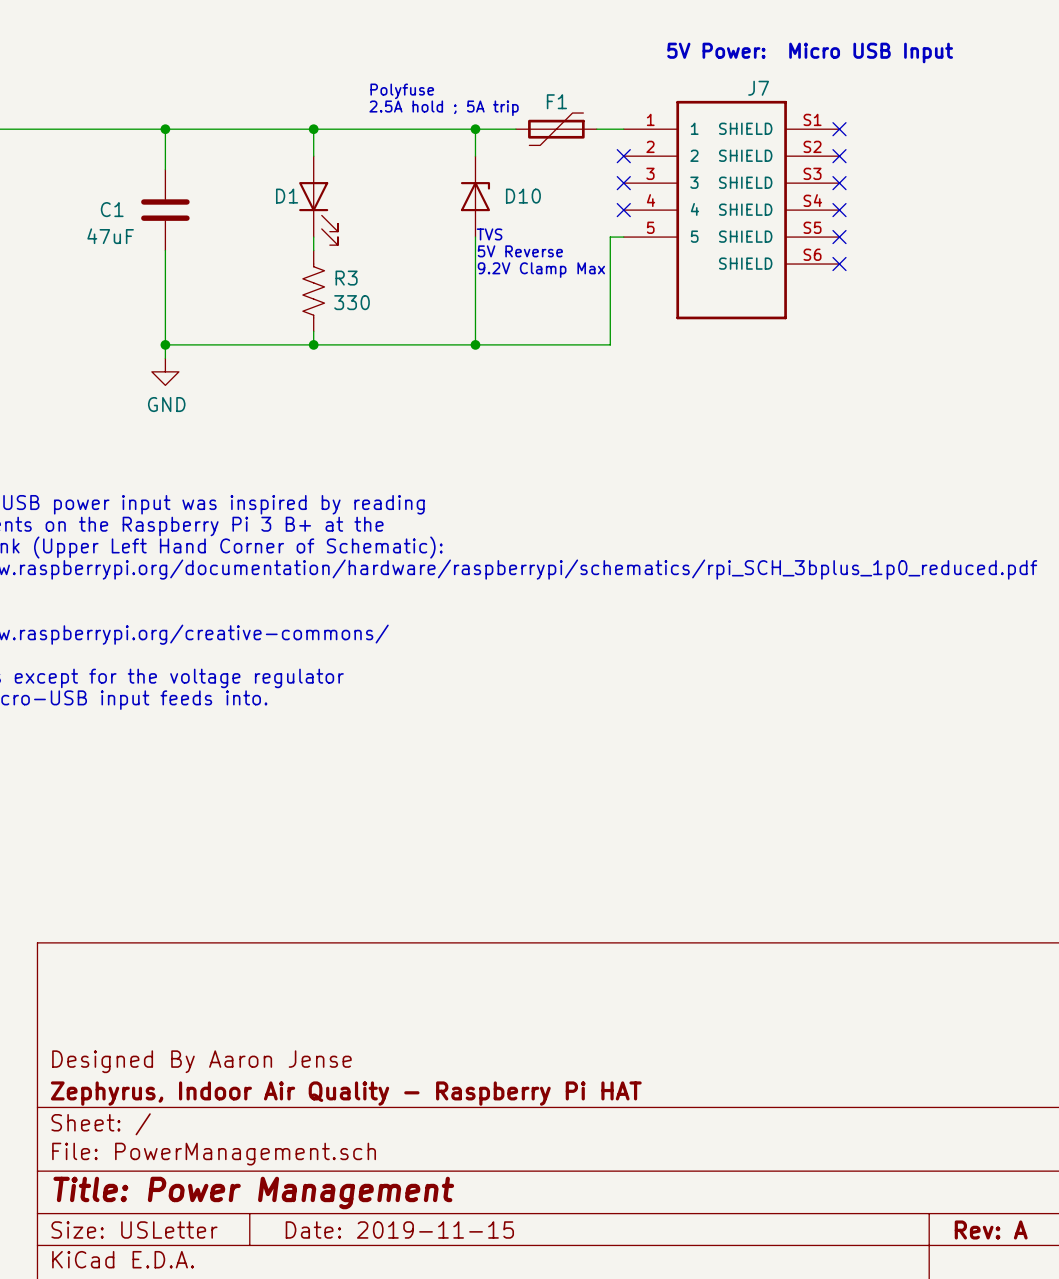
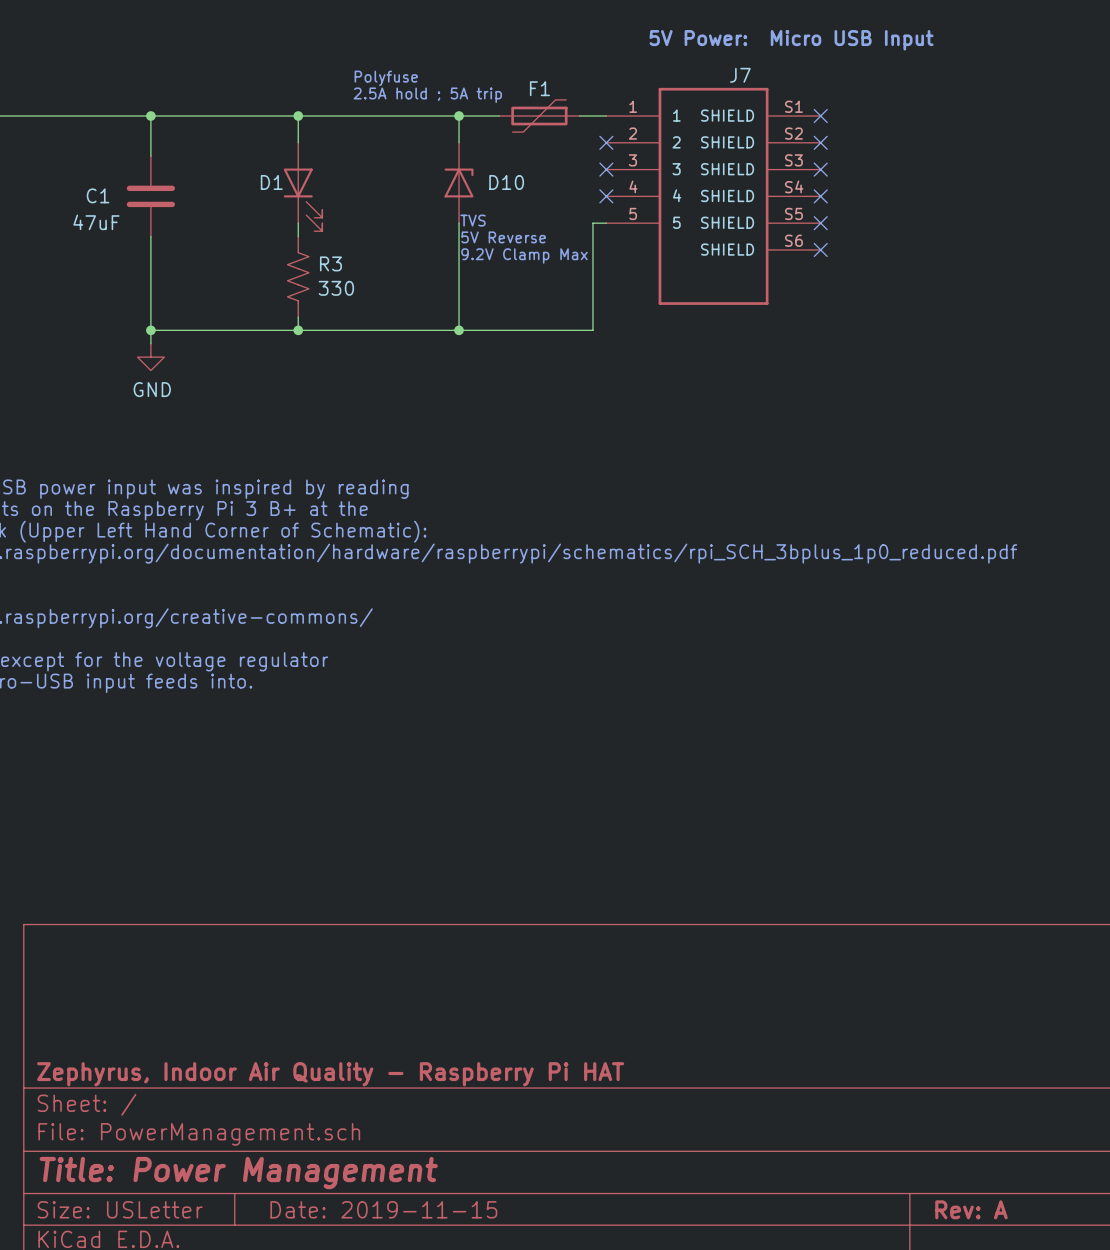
title block: Designed By Aaron Jense (201, 1061) -> none

